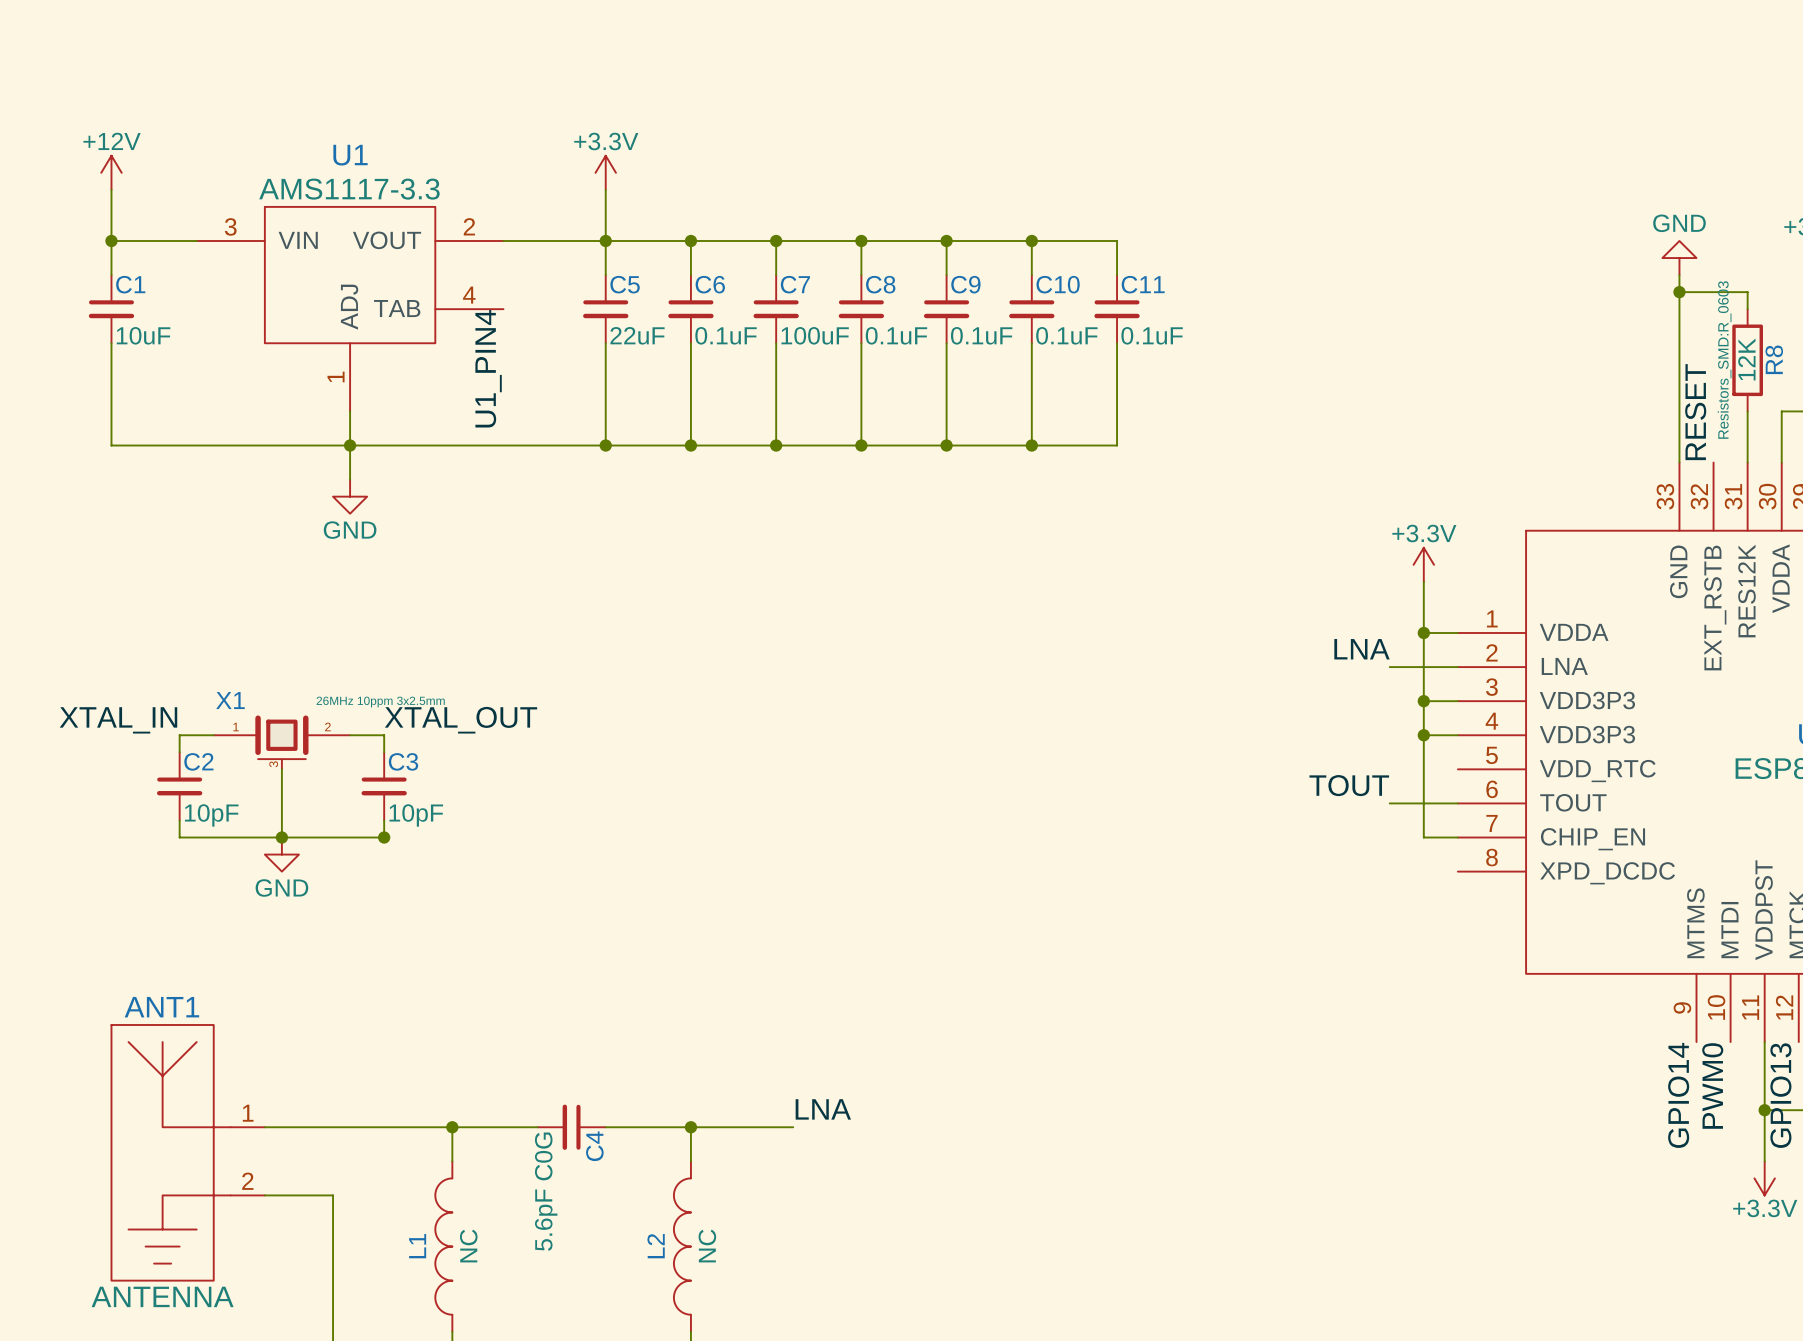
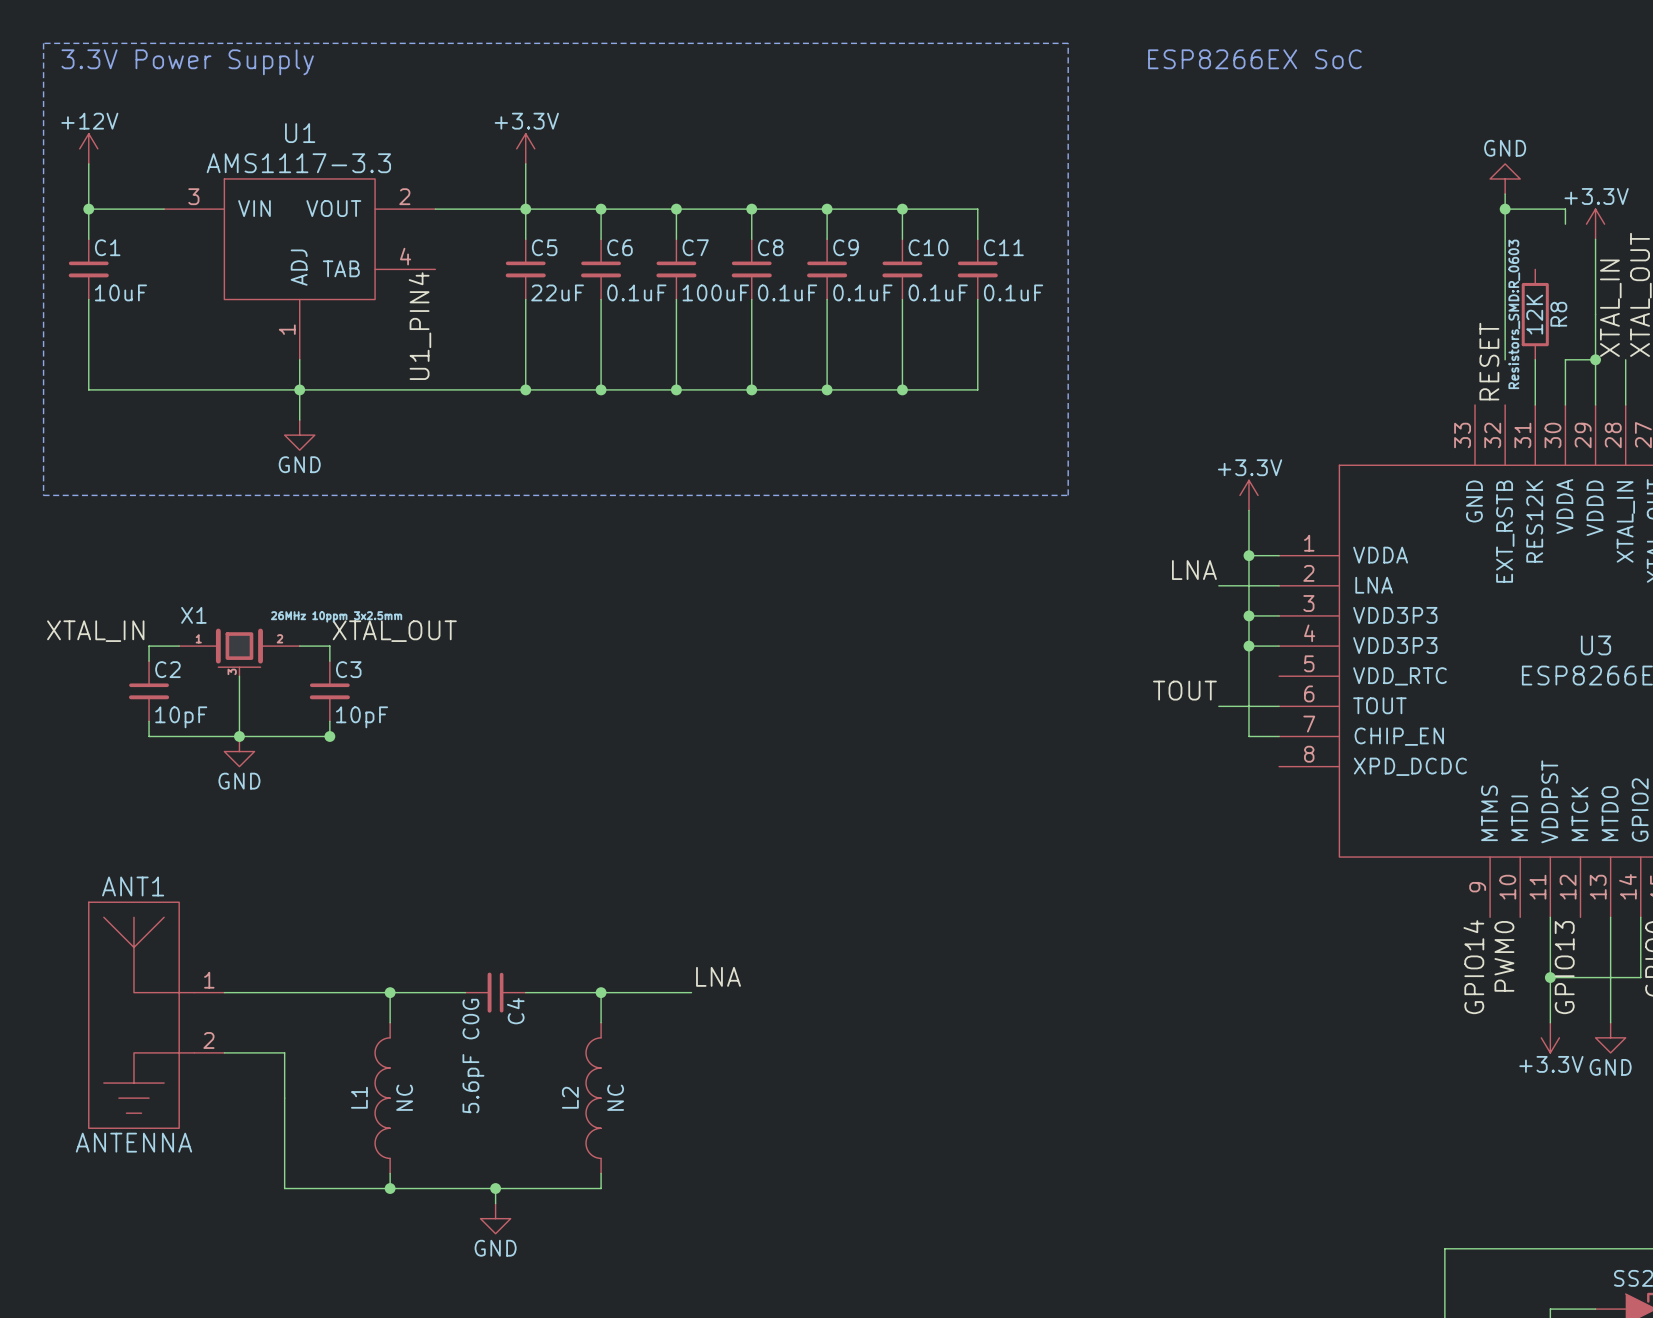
line: none -> (43, 43) (43, 495) (1068, 495) (1068, 43) (43, 43)
text: none -> ESP8266EX SoC (1254, 59)
text: none -> 3.3V Power Supply (187, 62)
power symbol position: GND (1679, 258) -> GND (1505, 178)
wire: (1679, 275) (1679, 462) -> (1505, 194) (1505, 359)
wire: (1679, 292) (1747, 292) (1747, 309) -> (1505, 209) (1565, 209) (1565, 224)
junction position: (1679, 292) -> (1505, 209)

